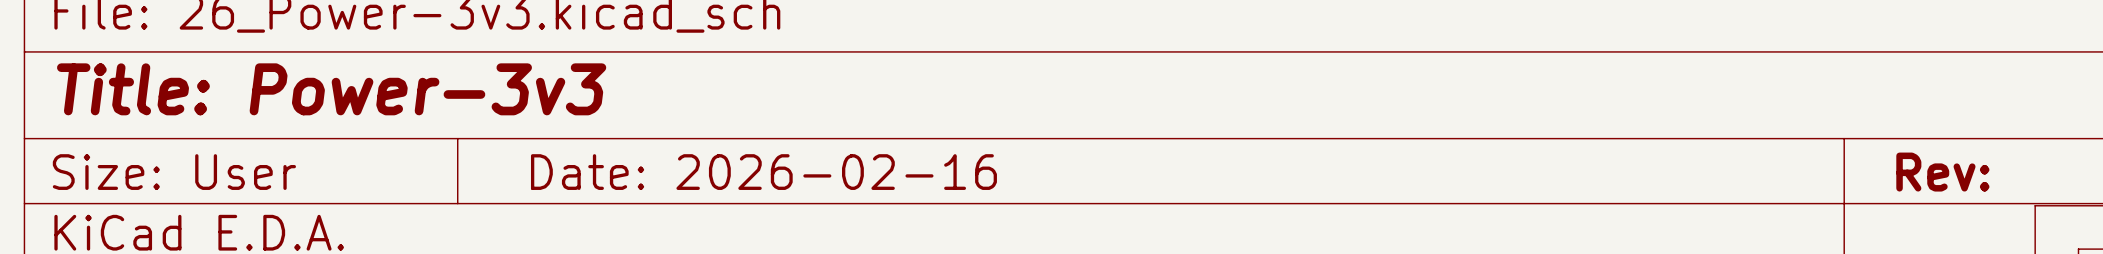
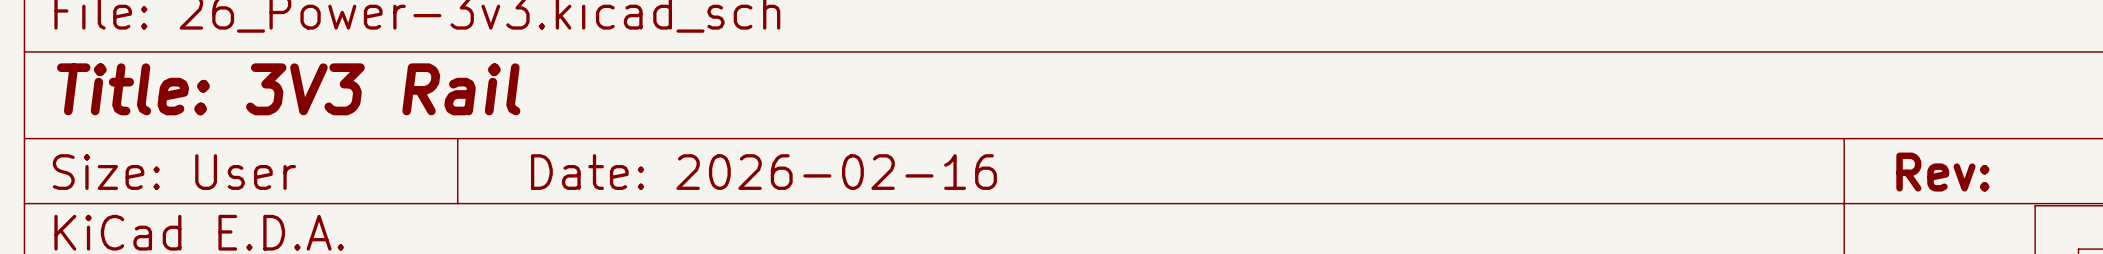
title block: Title: Power-3v3 (331, 89) -> Title: 3V3 Rail (288, 89)

